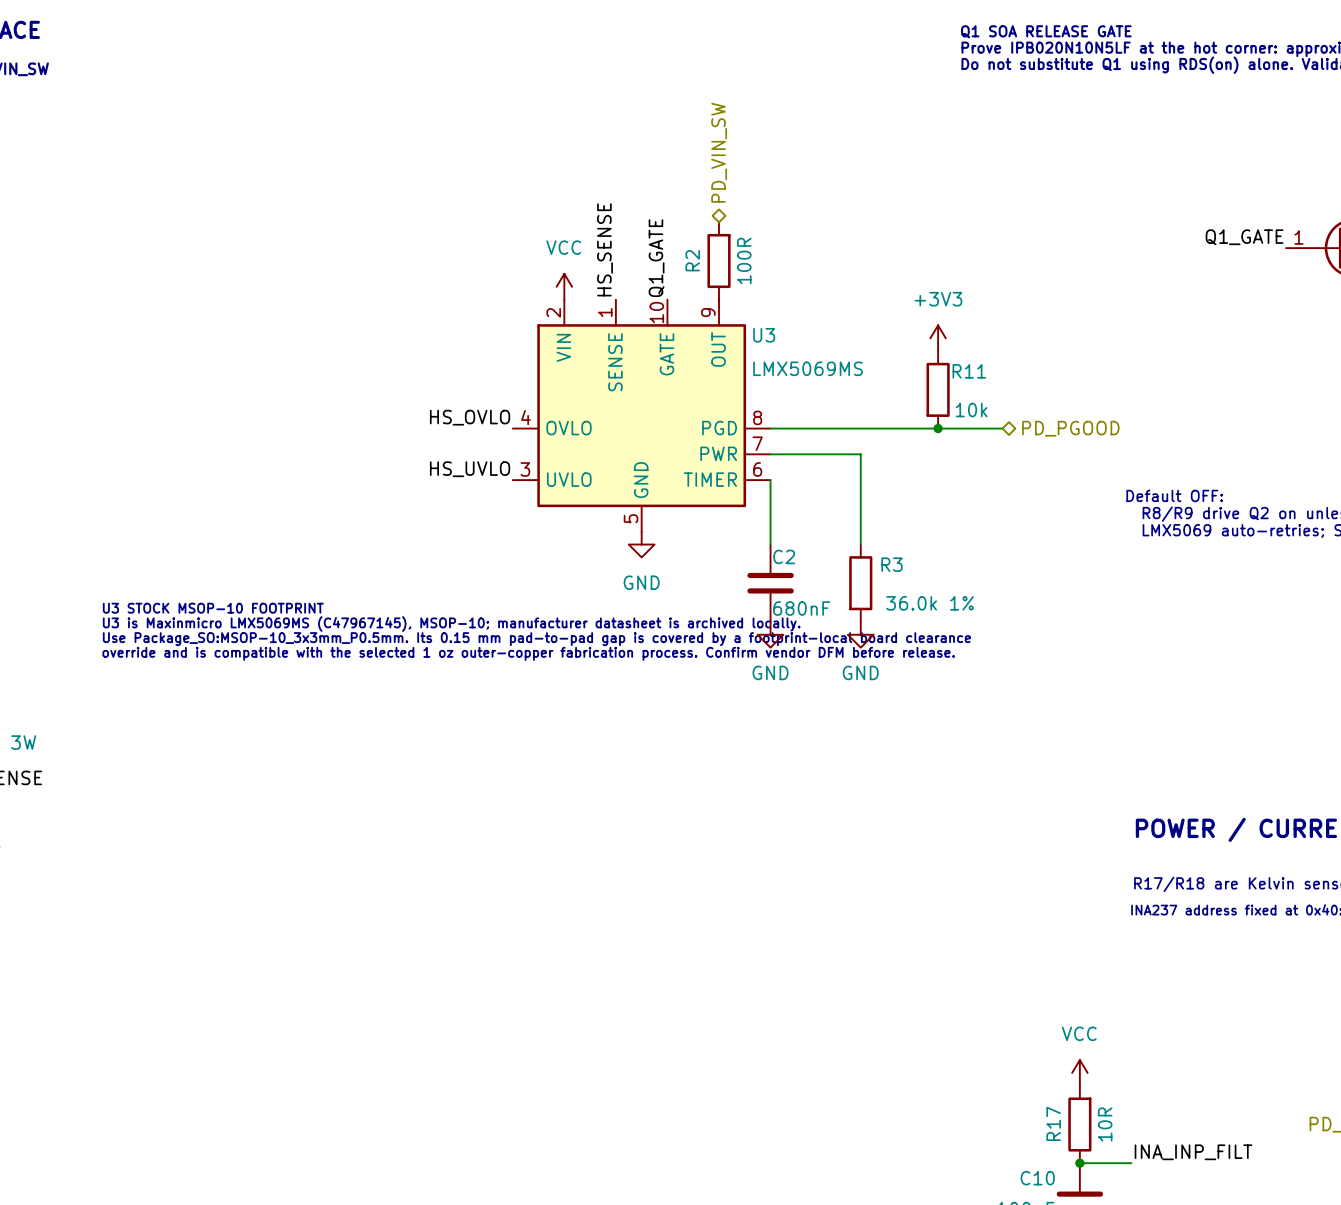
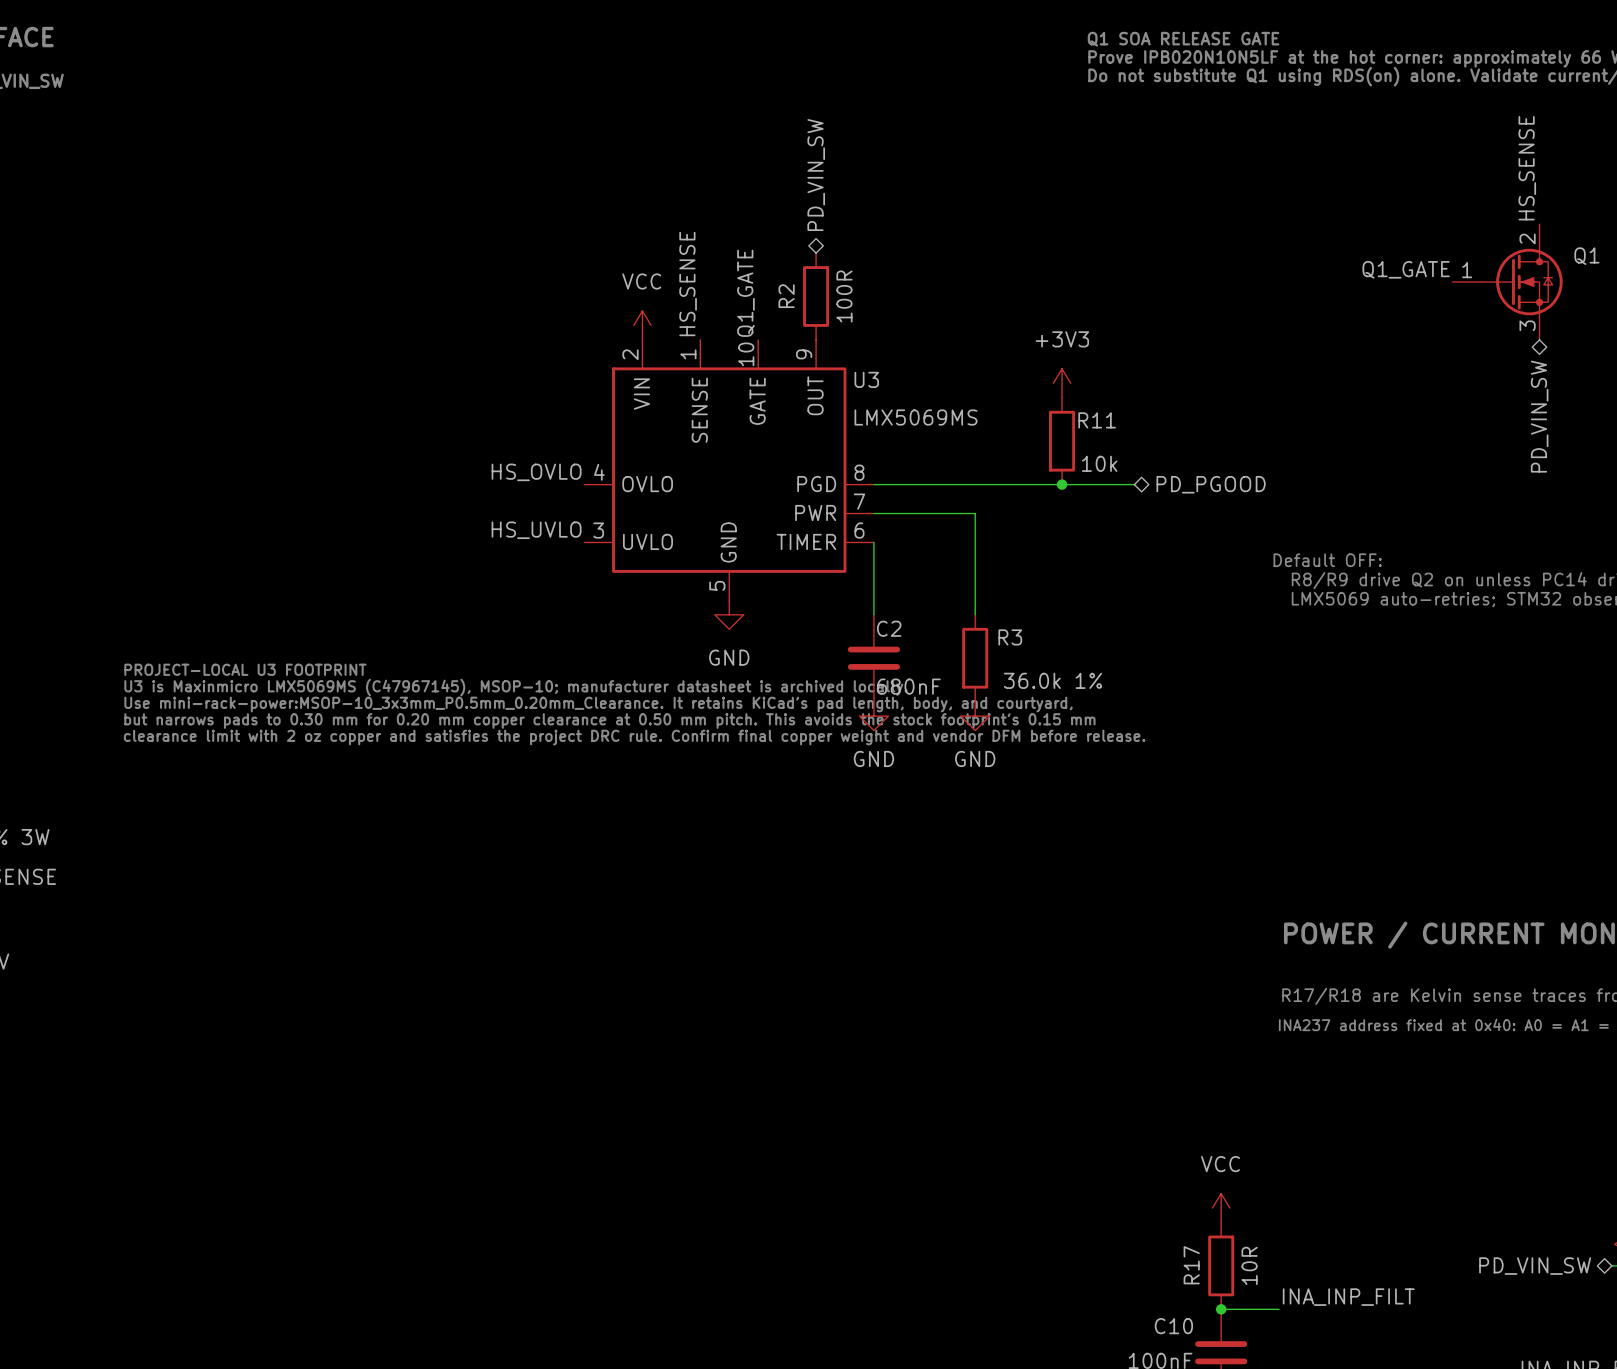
text: none -> PROJECT-LOCAL U3 FOOTPRINT (245, 669)
text: U3 STOCK MSOP-10 FOOTPRINT (213, 608) -> U3 is Maxinmicro LMX5069MS (C47967145), MSOP-10; manufacturer datasheet is archived locally. (515, 687)
text: U3 is Maxinmicro LMX5069MS (C47967145), MSOP-10; manufacturer datasheet is archived locally. (451, 623) -> Use mini-rack-power:MSOP-10_3x3mm_P0.5mm_0.20mm_Clearance. It retains KiCad's pad length, body, and courtyard, (598, 704)
text: Use Package_SO:MSOP-10_3x3mm_P0.5mm. Its 0.15 mm pad-to-pad gap is covered by a footprint-local board clearance (536, 639) -> but narrows pads to 0.30 mm for 0.20 mm copper clearance at 0.50 mm pitch. This avoids the stock footprint's 0.15 mm (609, 721)
text: override and is compatible with the selected 1 oz outer-copper fabrication process. Confirm vendor DFM before release. (528, 653) -> clearance limit with 2 oz copper and satisfies the project DRC rule. Confirm final copper weight and vendor DFM before release. (634, 737)

